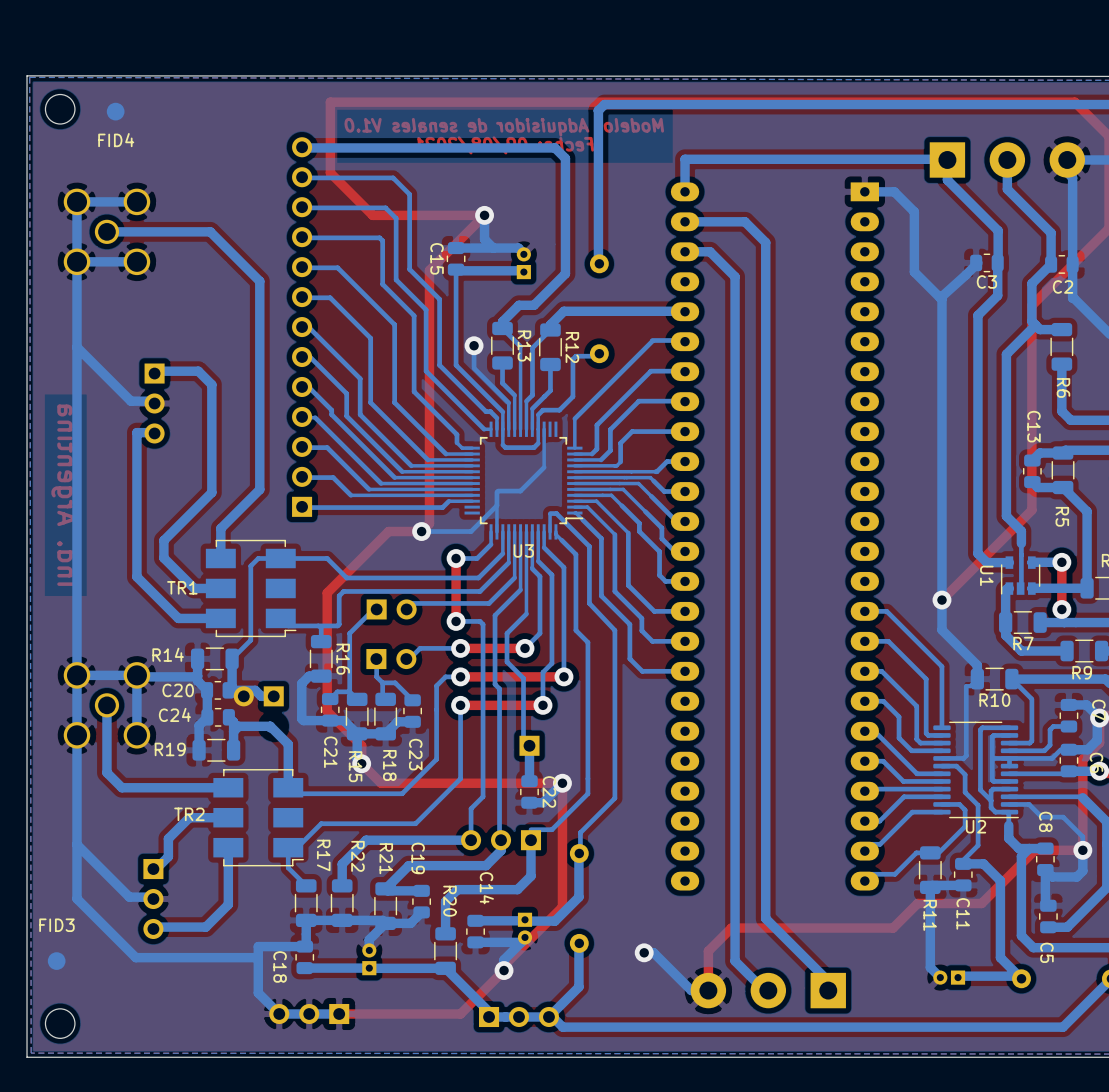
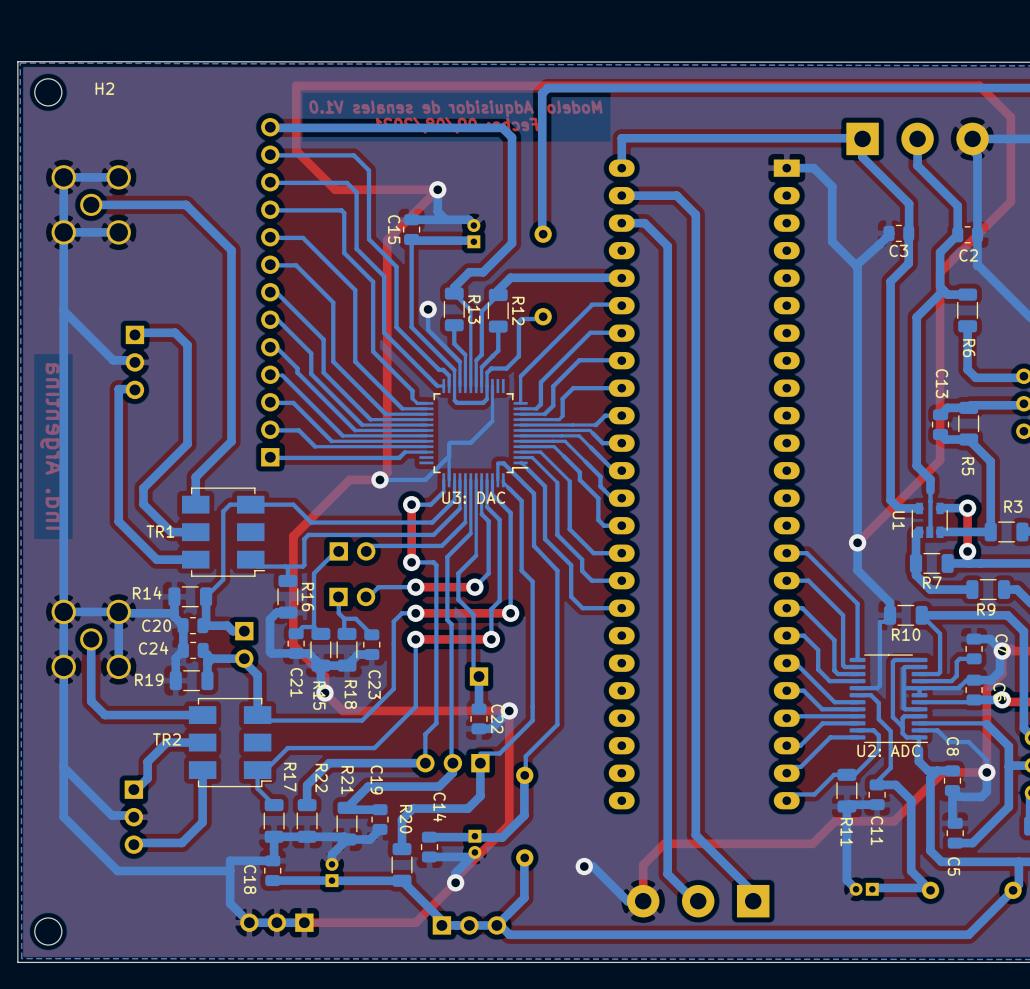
H2 name: none -> H2 (104, 88)
FID4: (115, 111) -> none
U3 name: U3 (523, 550) -> U3: DAC (473, 497)
part rotation: 0° (258, 696) -> 90° counterclockwise (244, 644)
U2 name: U2 (976, 826) -> U2: ADC (888, 750)
FID3: (56, 961) -> none

